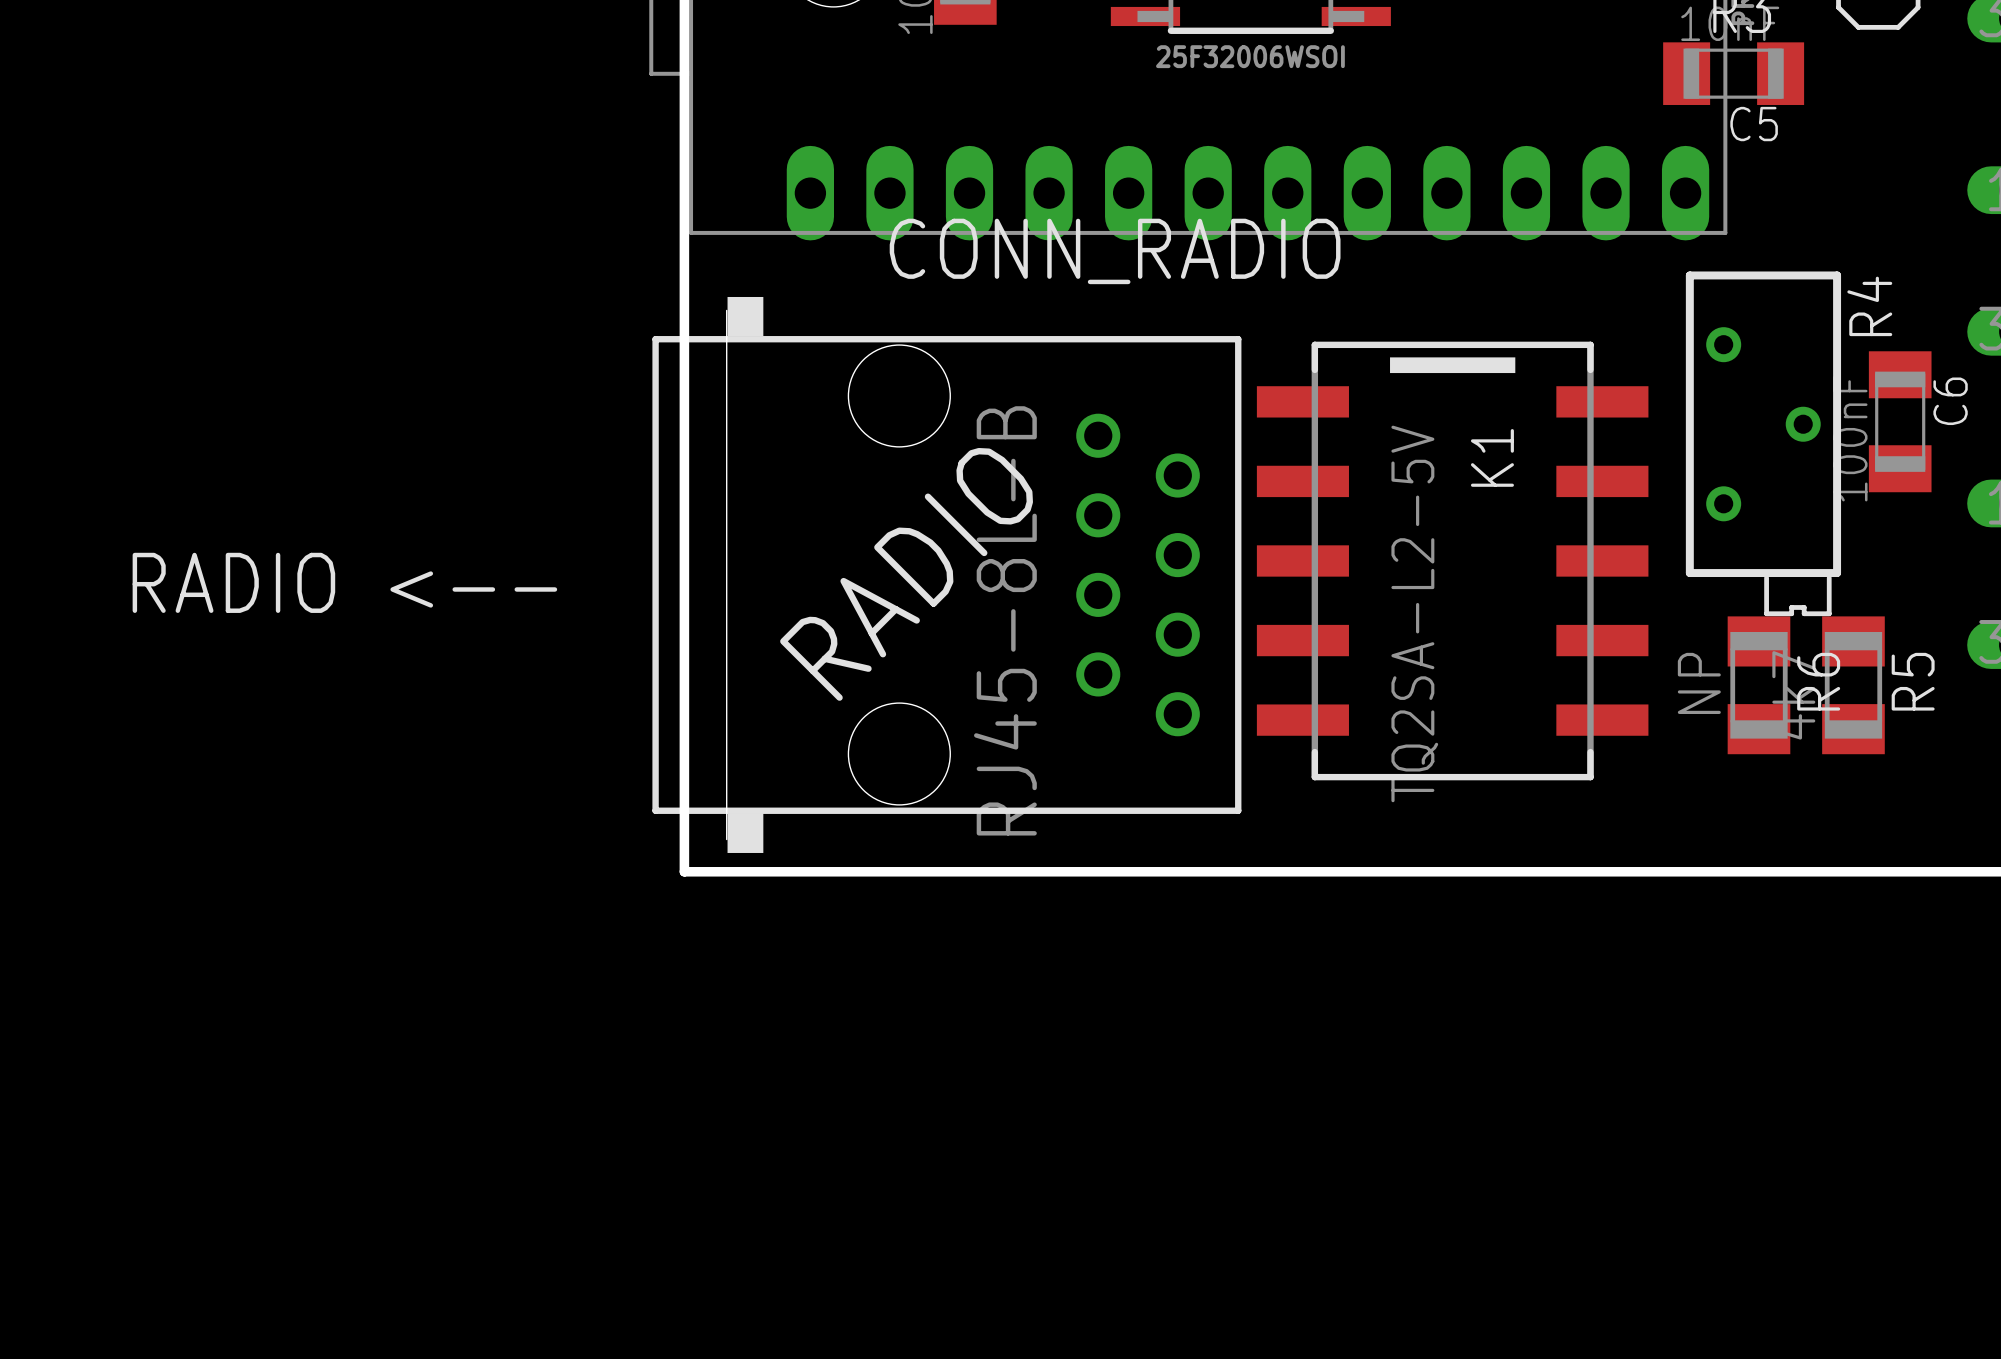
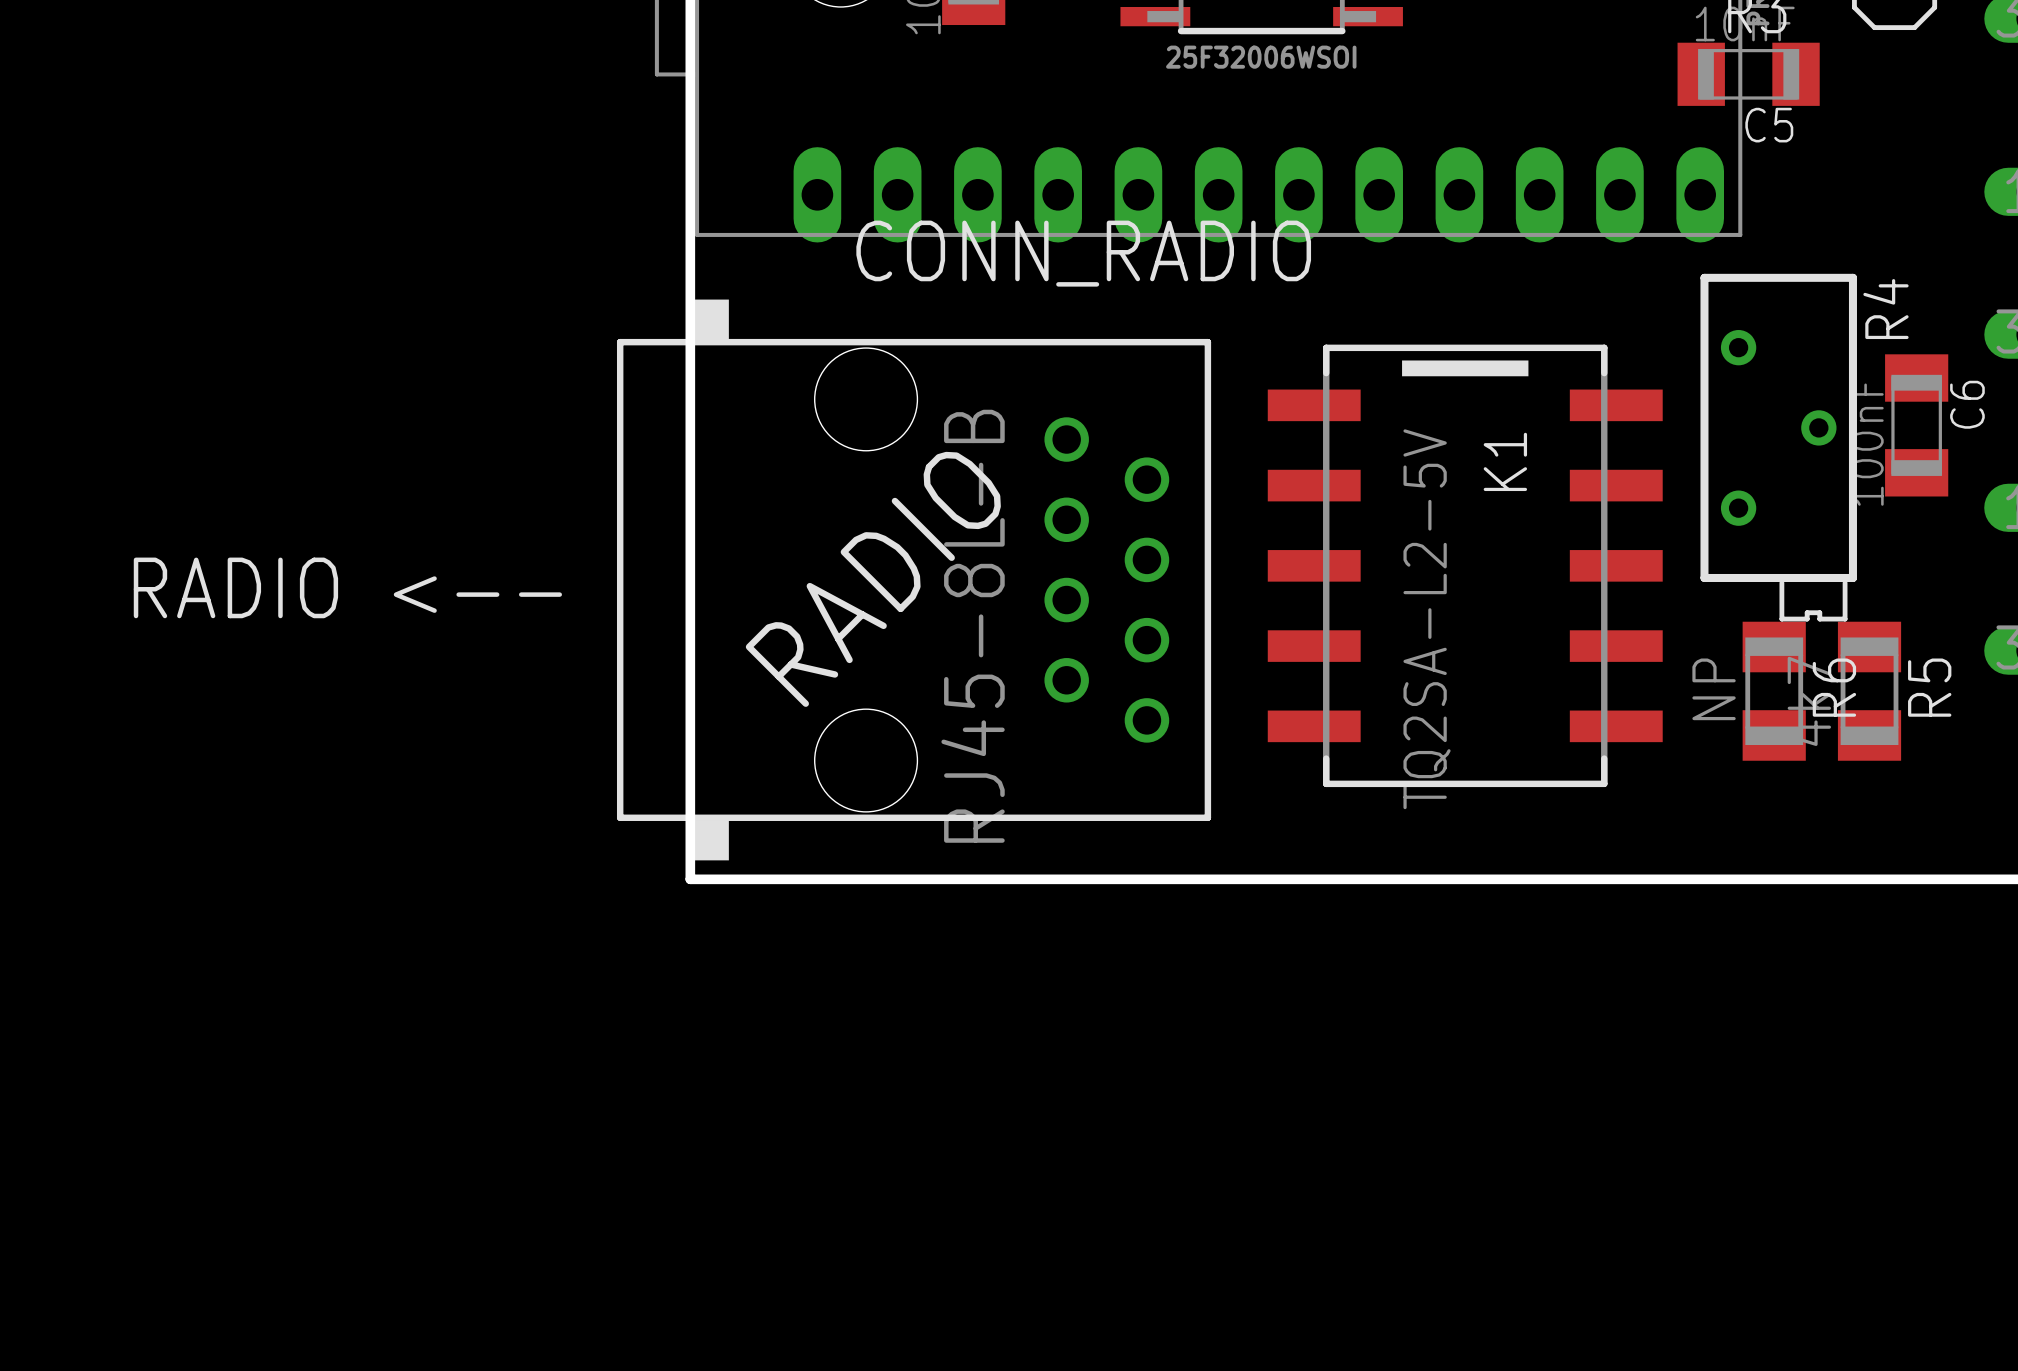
text position: RADIO (906, 574) -> RADIO (873, 579)
CONN_RADIO position: (946, 574) -> (914, 579)

